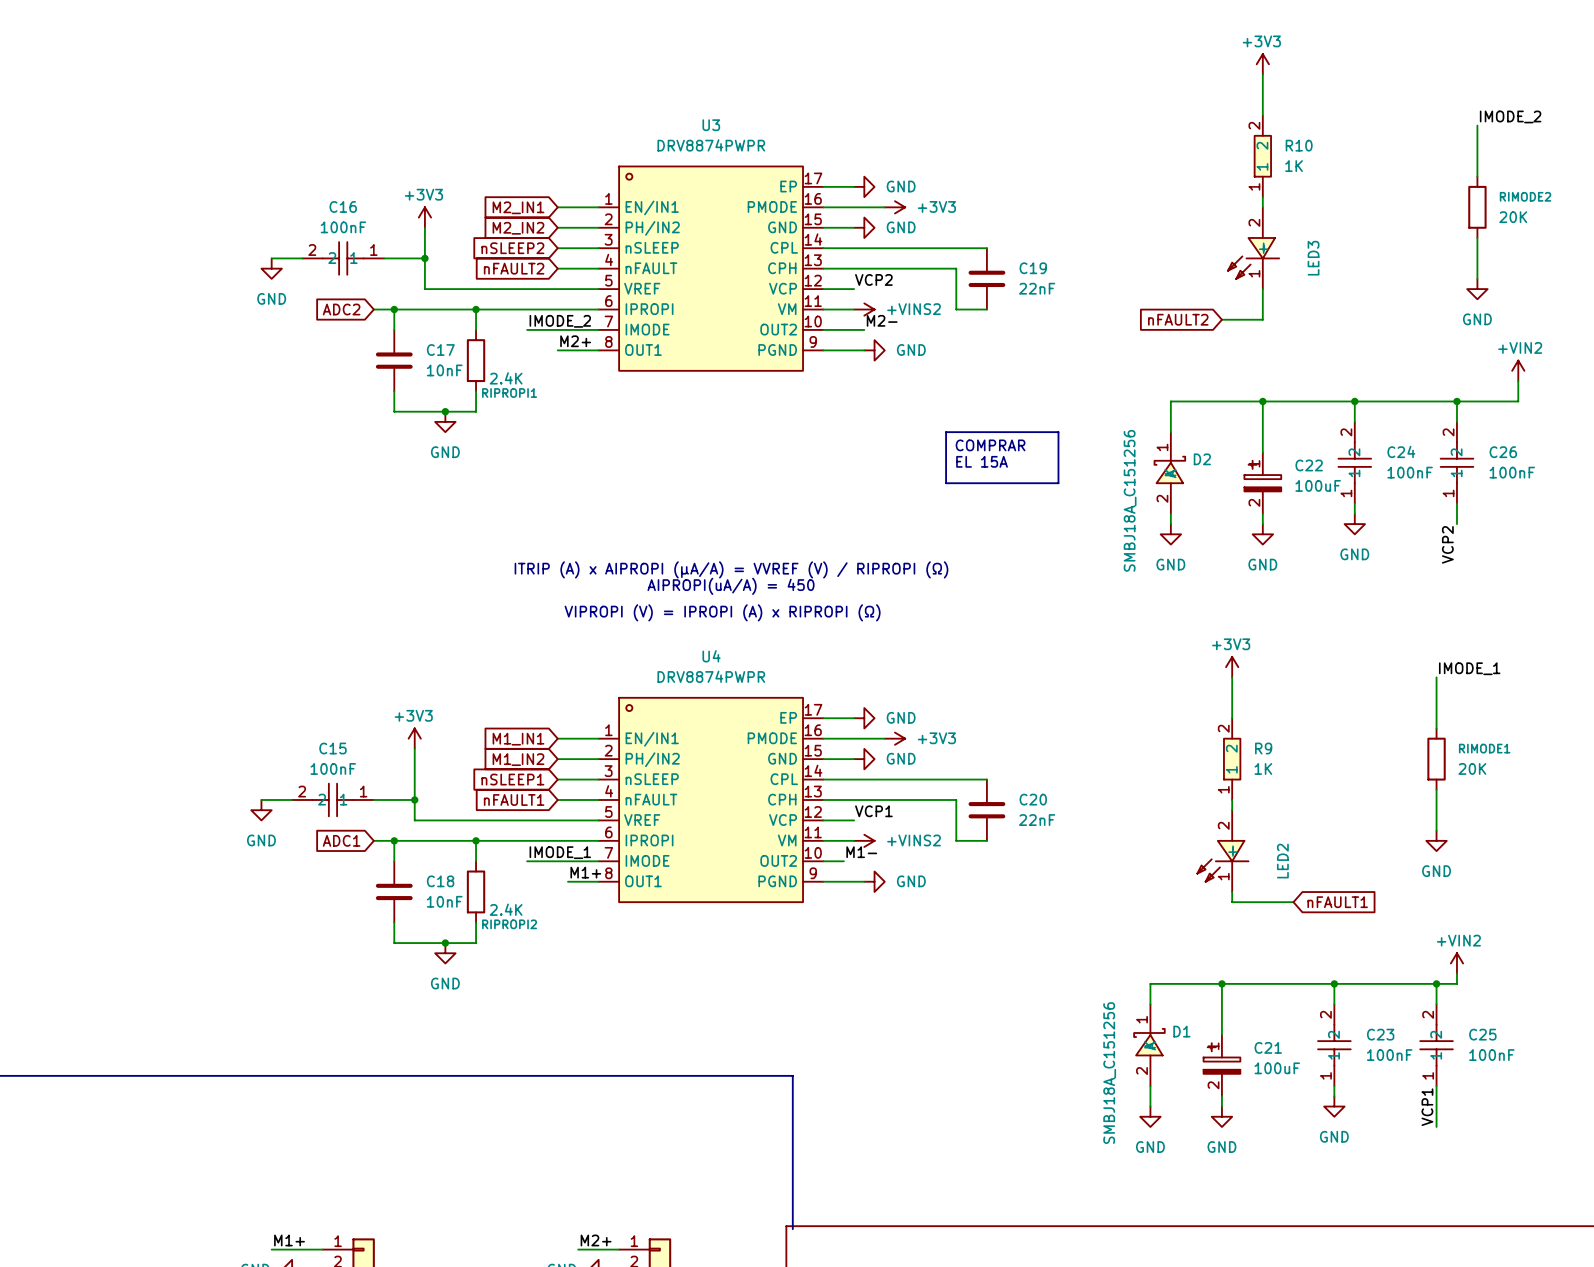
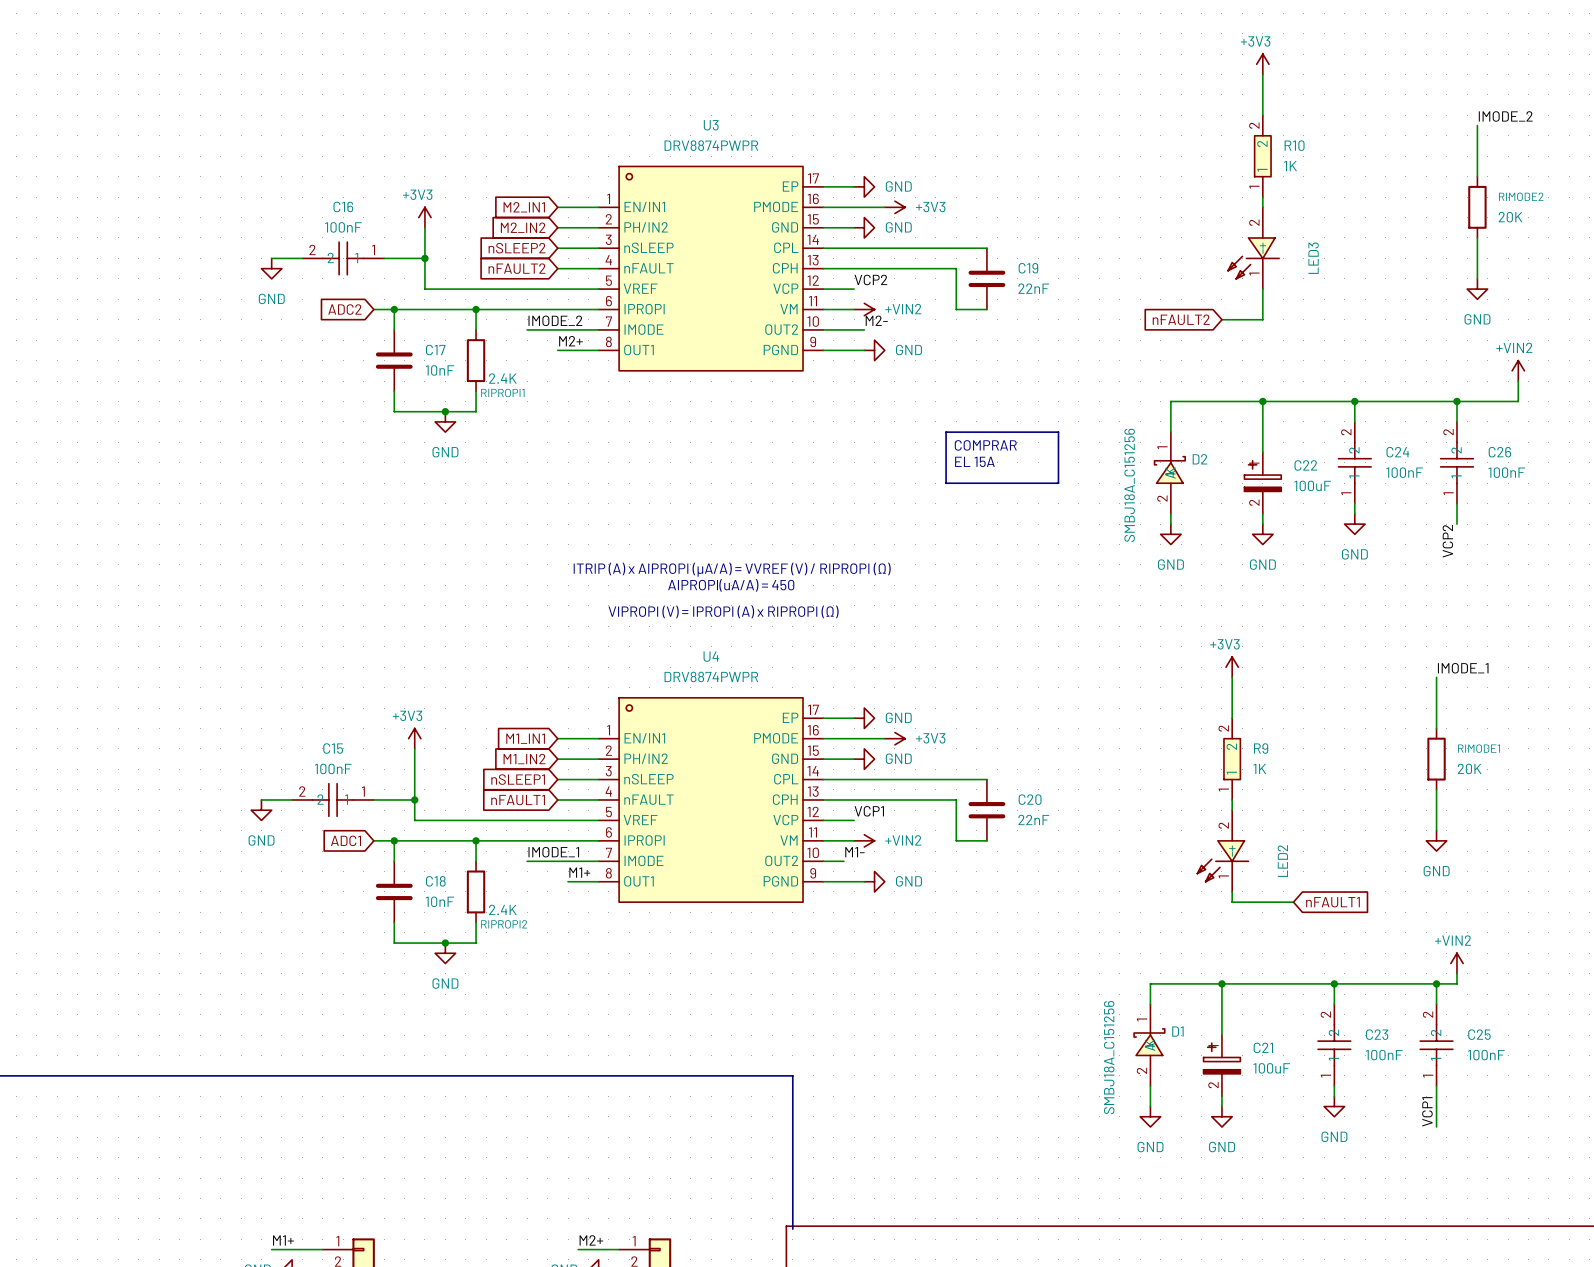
power symbol: +VINS2 (864, 309) -> +VIN2 (864, 309)
power symbol: +VINS2 (864, 840) -> +VIN2 (864, 840)

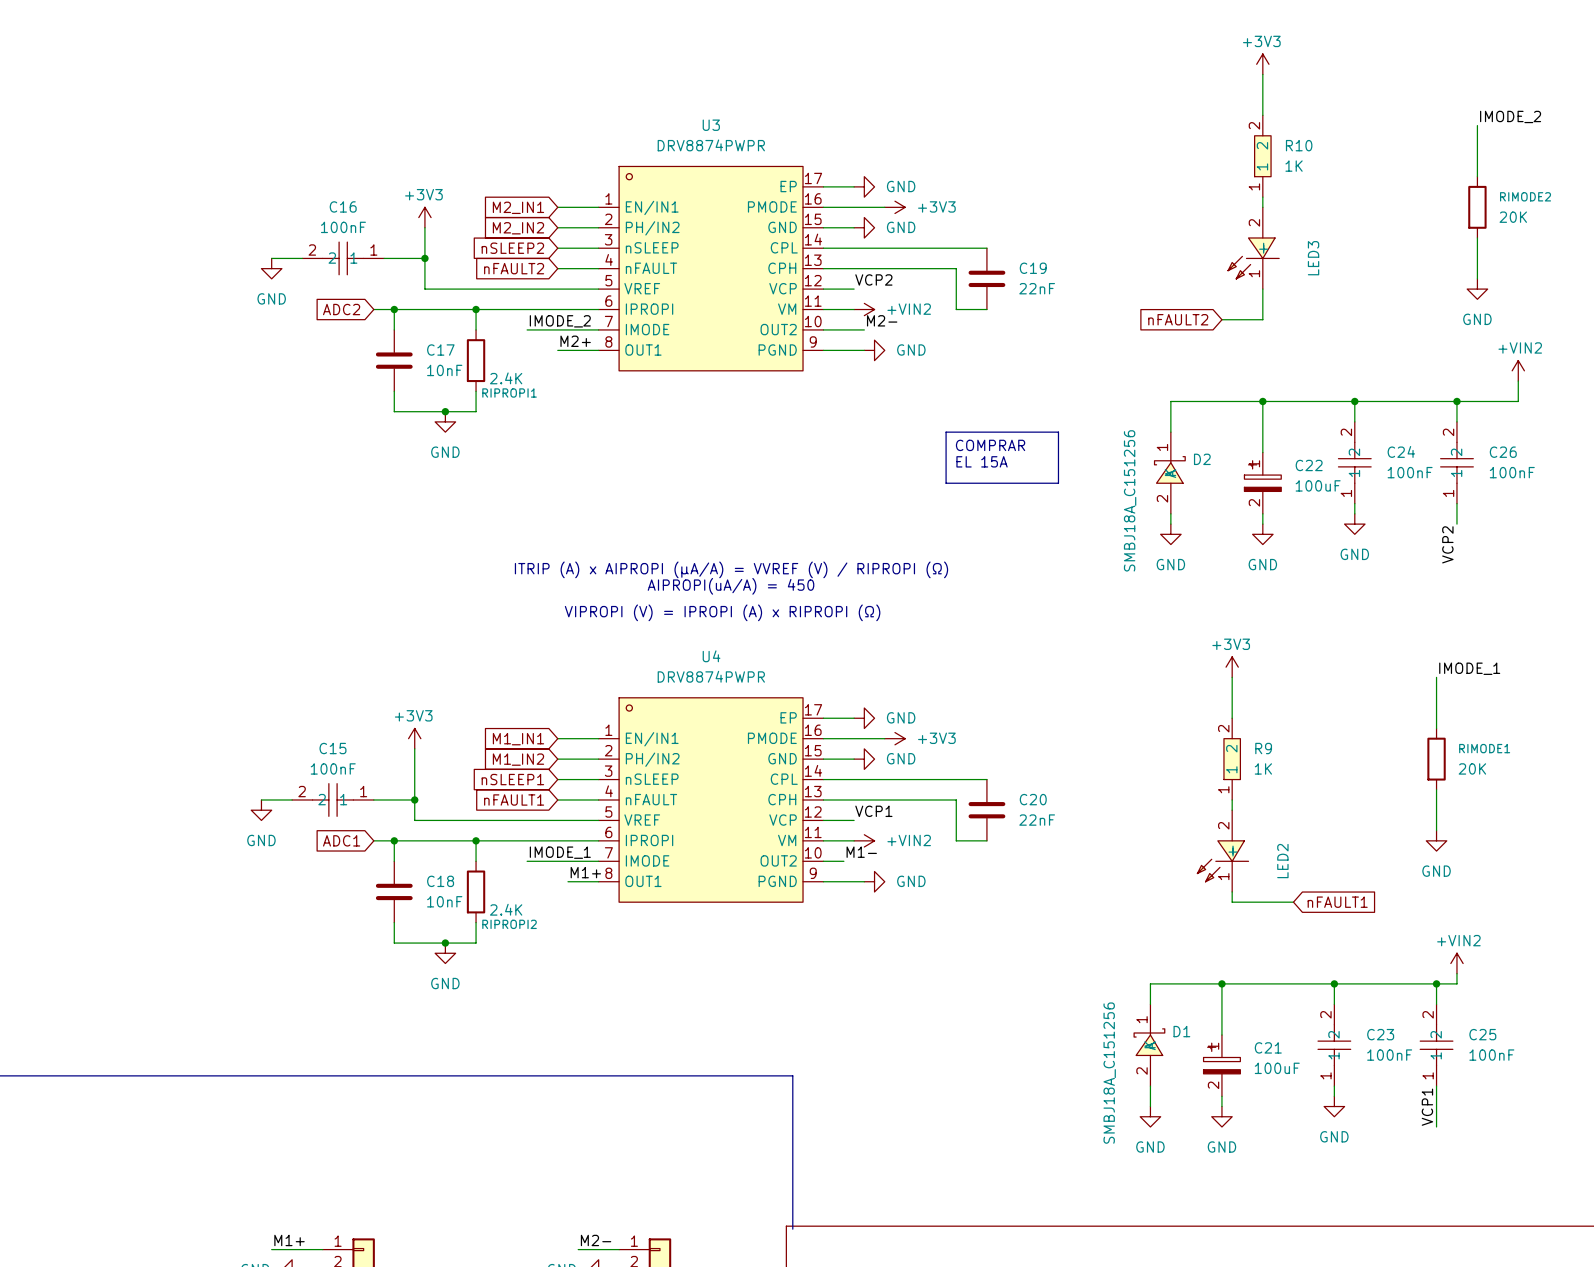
label: M2+ (591, 1240) -> M2- (596, 1240)

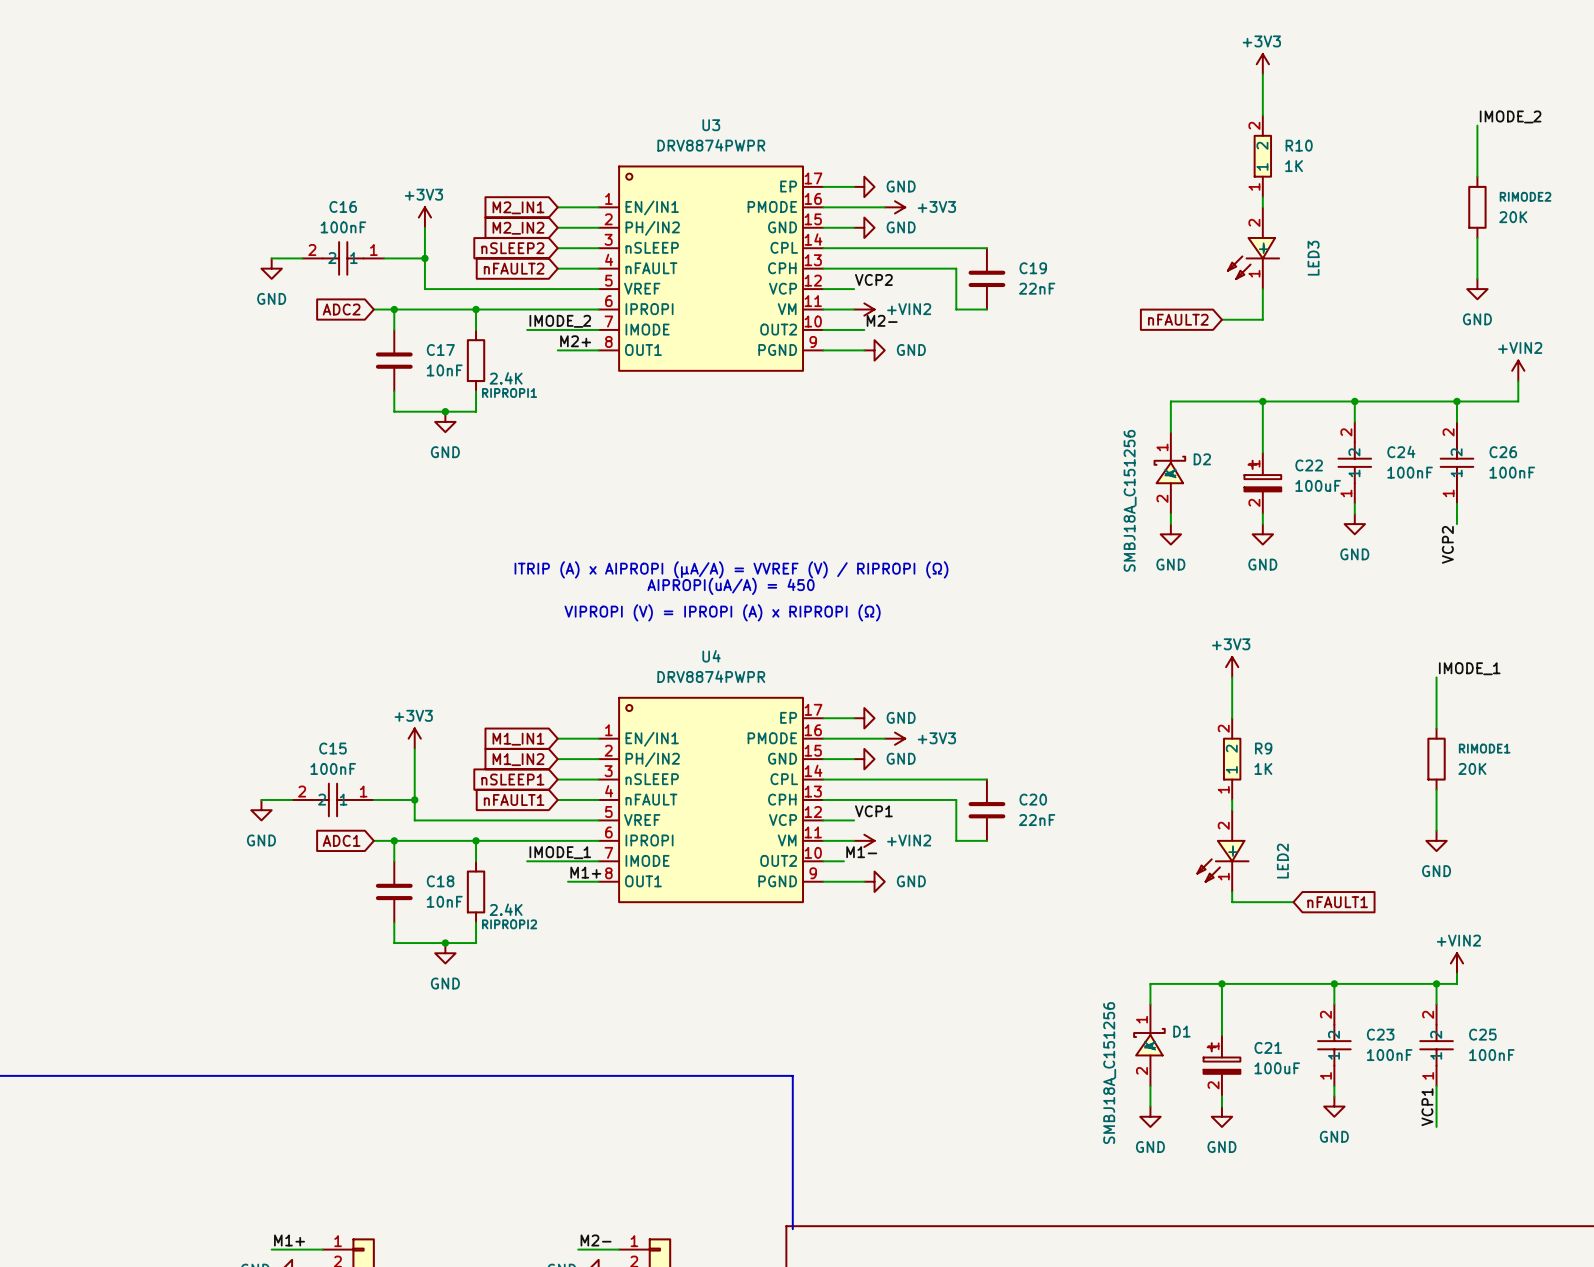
line: (946, 432) (1058, 432) (1058, 483) (946, 483) (946, 432) -> none
text: COMPRAR (990, 445) -> none
text: EL 15A (982, 461) -> none

